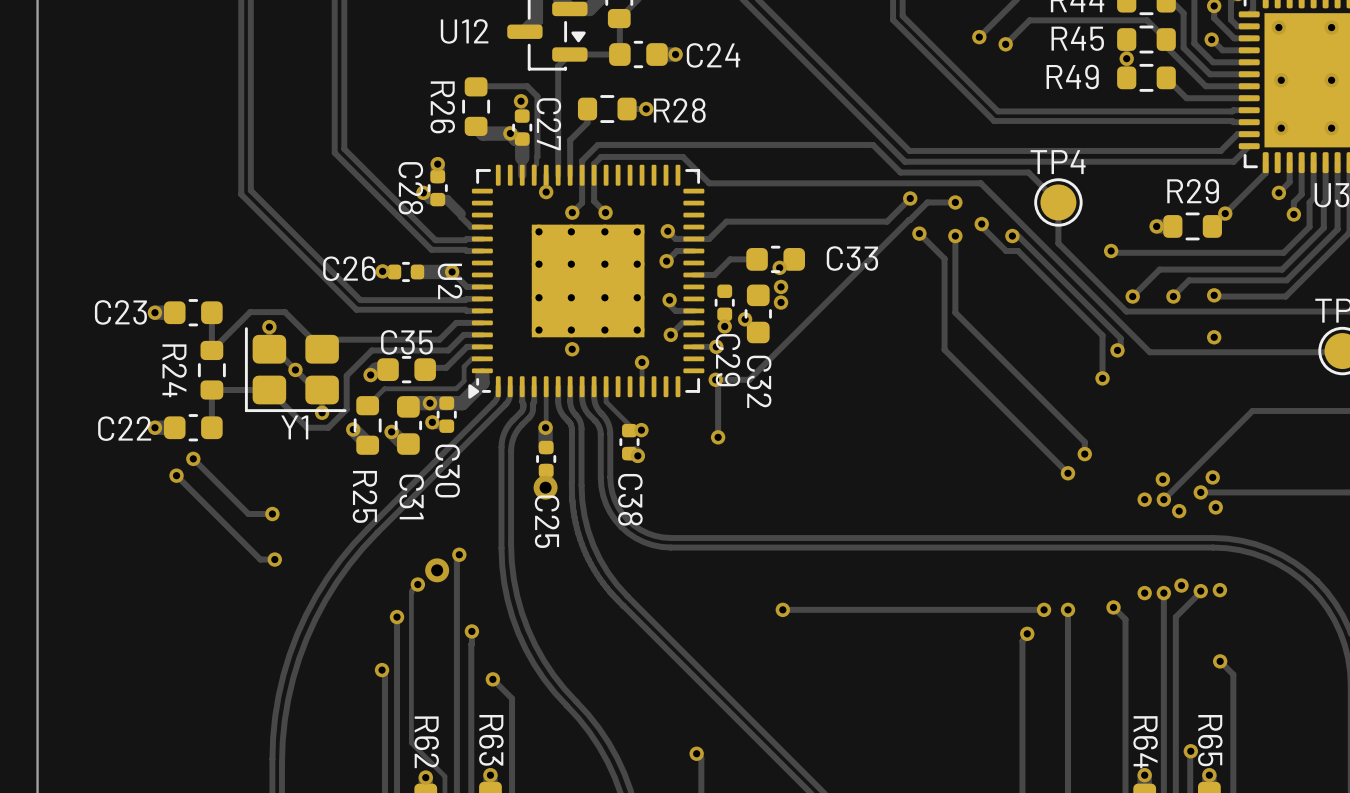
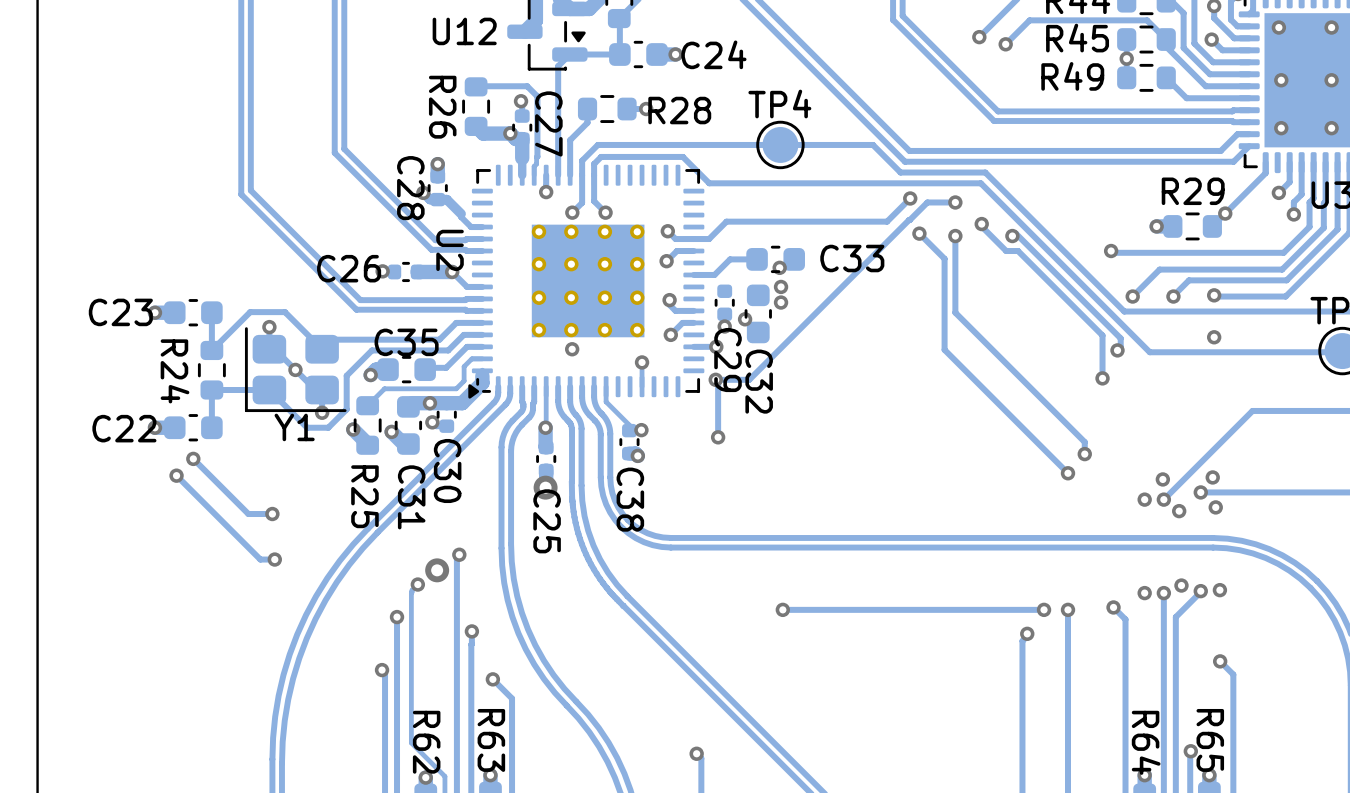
track: (985, 172) (1028, 172) (1058, 202) (1058, 243) (1126, 311) -> (985, 172) (1124, 311) (1126, 311)
TP4 position: (1058, 202) -> (780, 144)
U2 name position: U2 (450, 281) -> U2 (450, 250)

